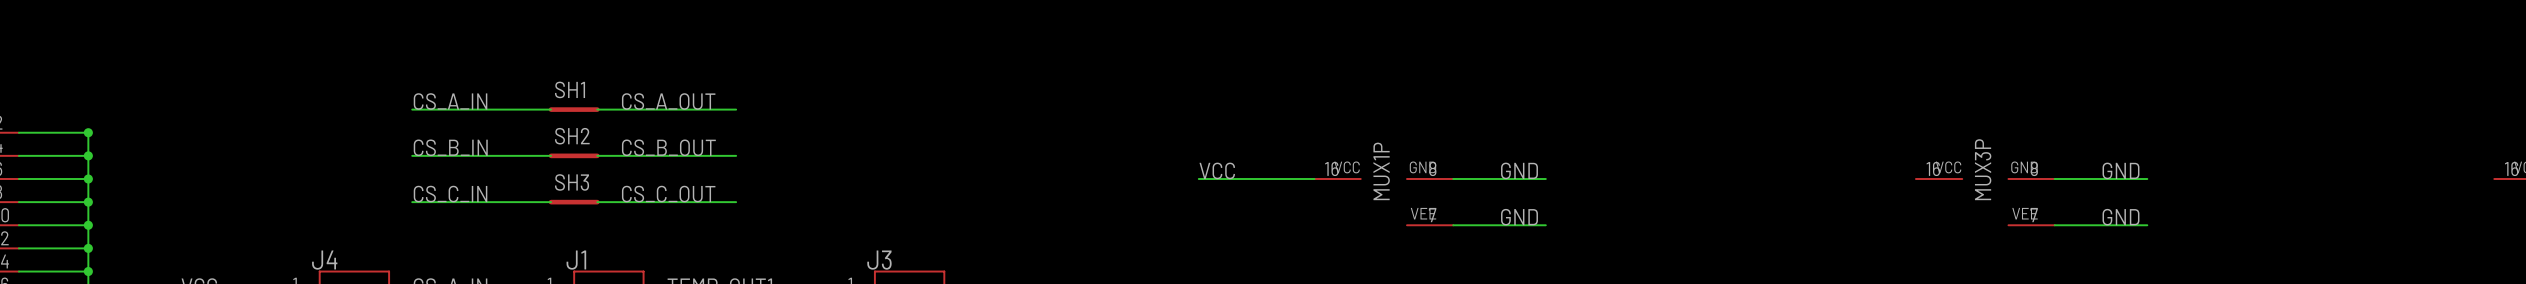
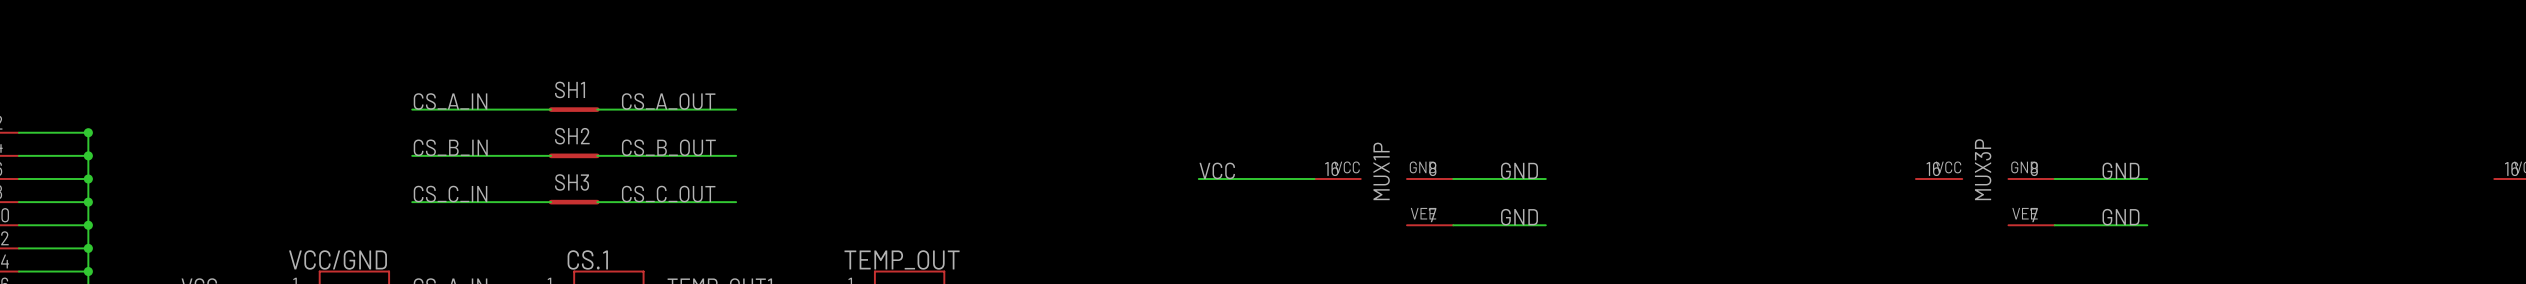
J4 name: J4 (324, 260) -> VCC/GND (338, 259)
J1 name: J1 (576, 260) -> CS.1 (587, 259)
J3 name: J3 (879, 260) -> TEMP_OUT (902, 259)

